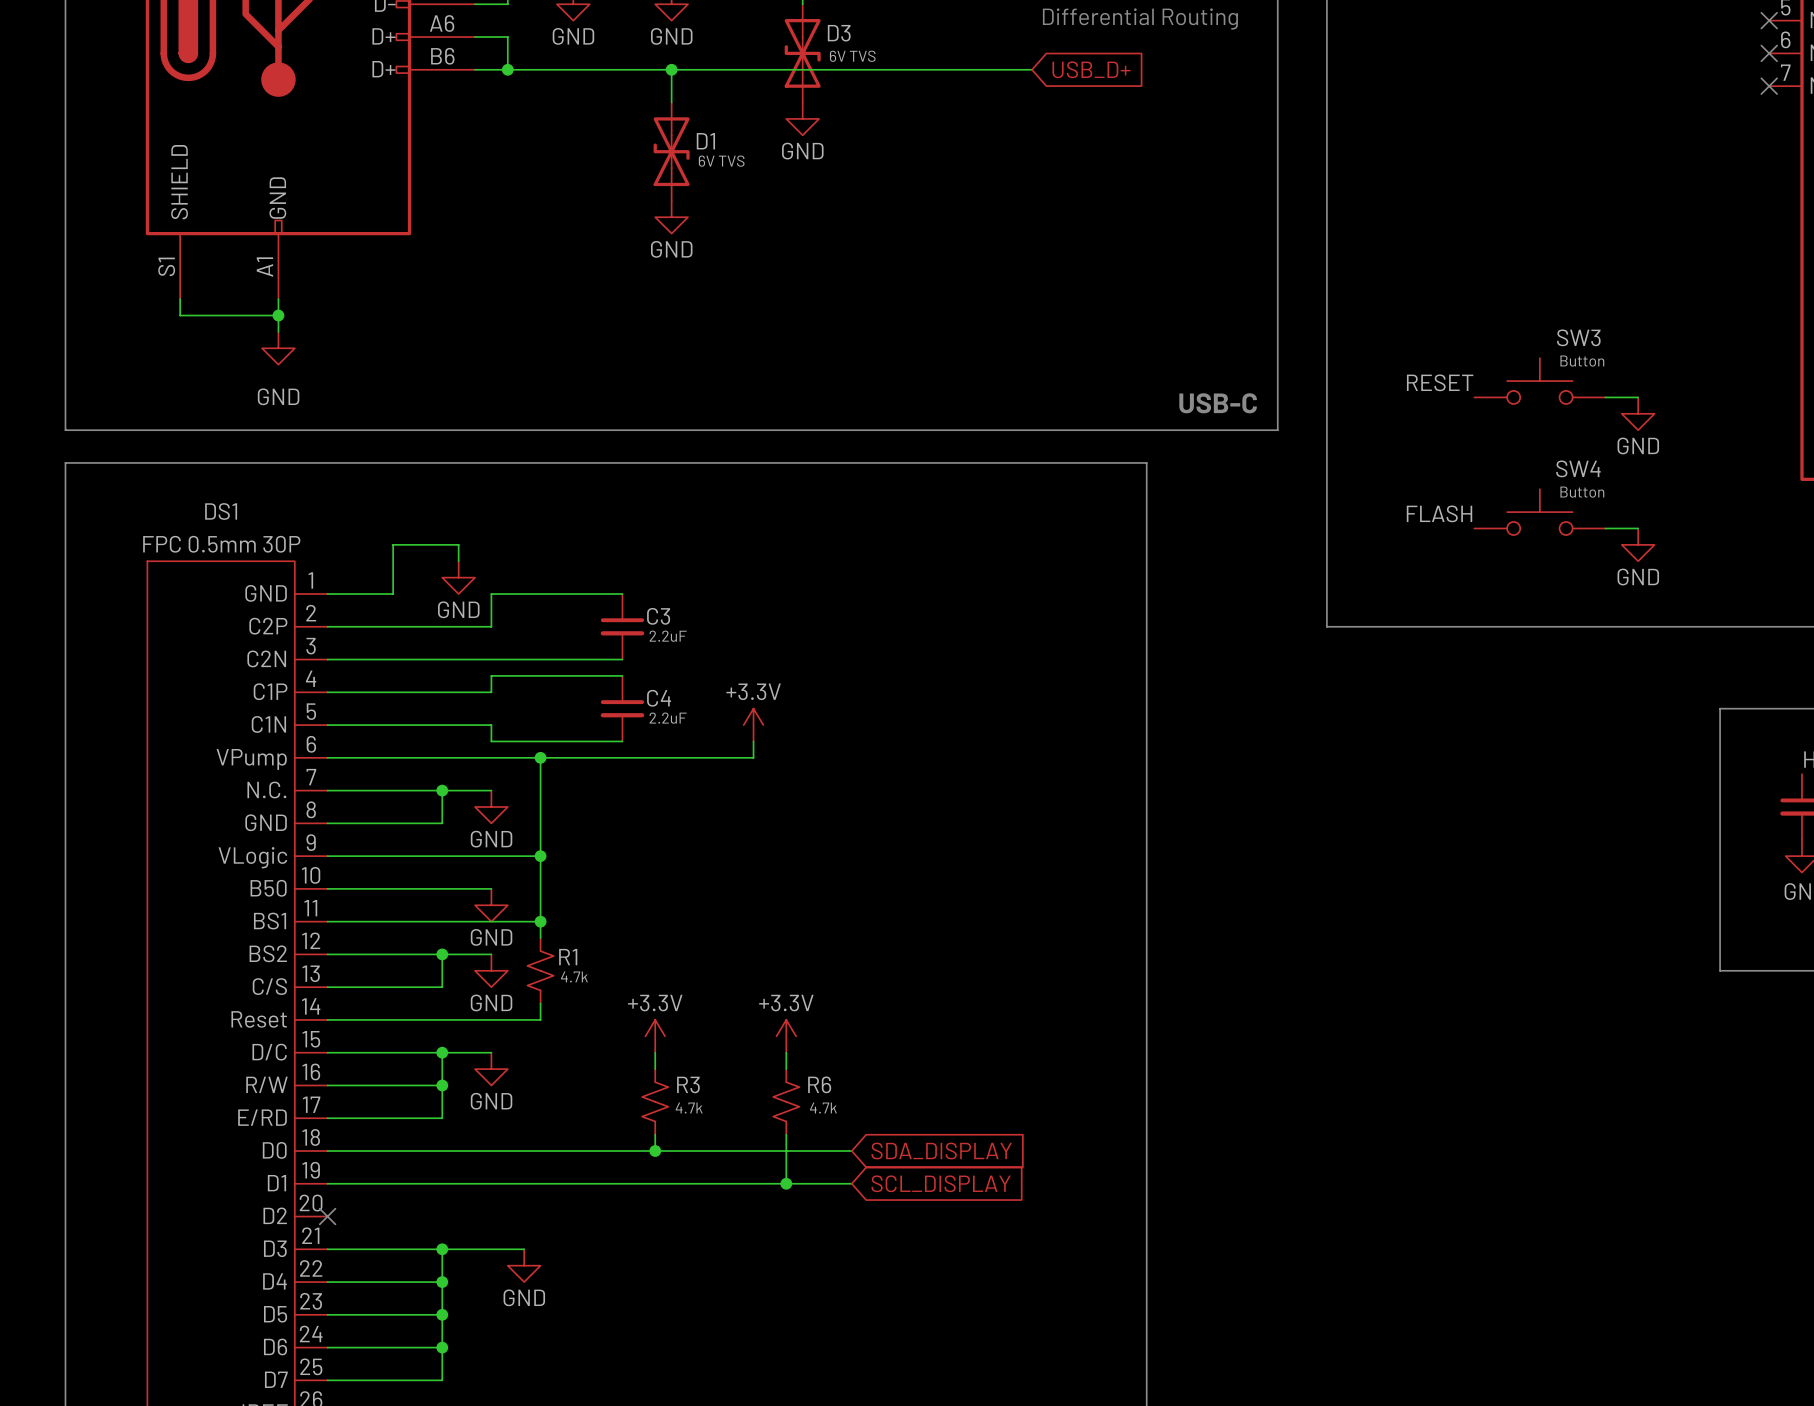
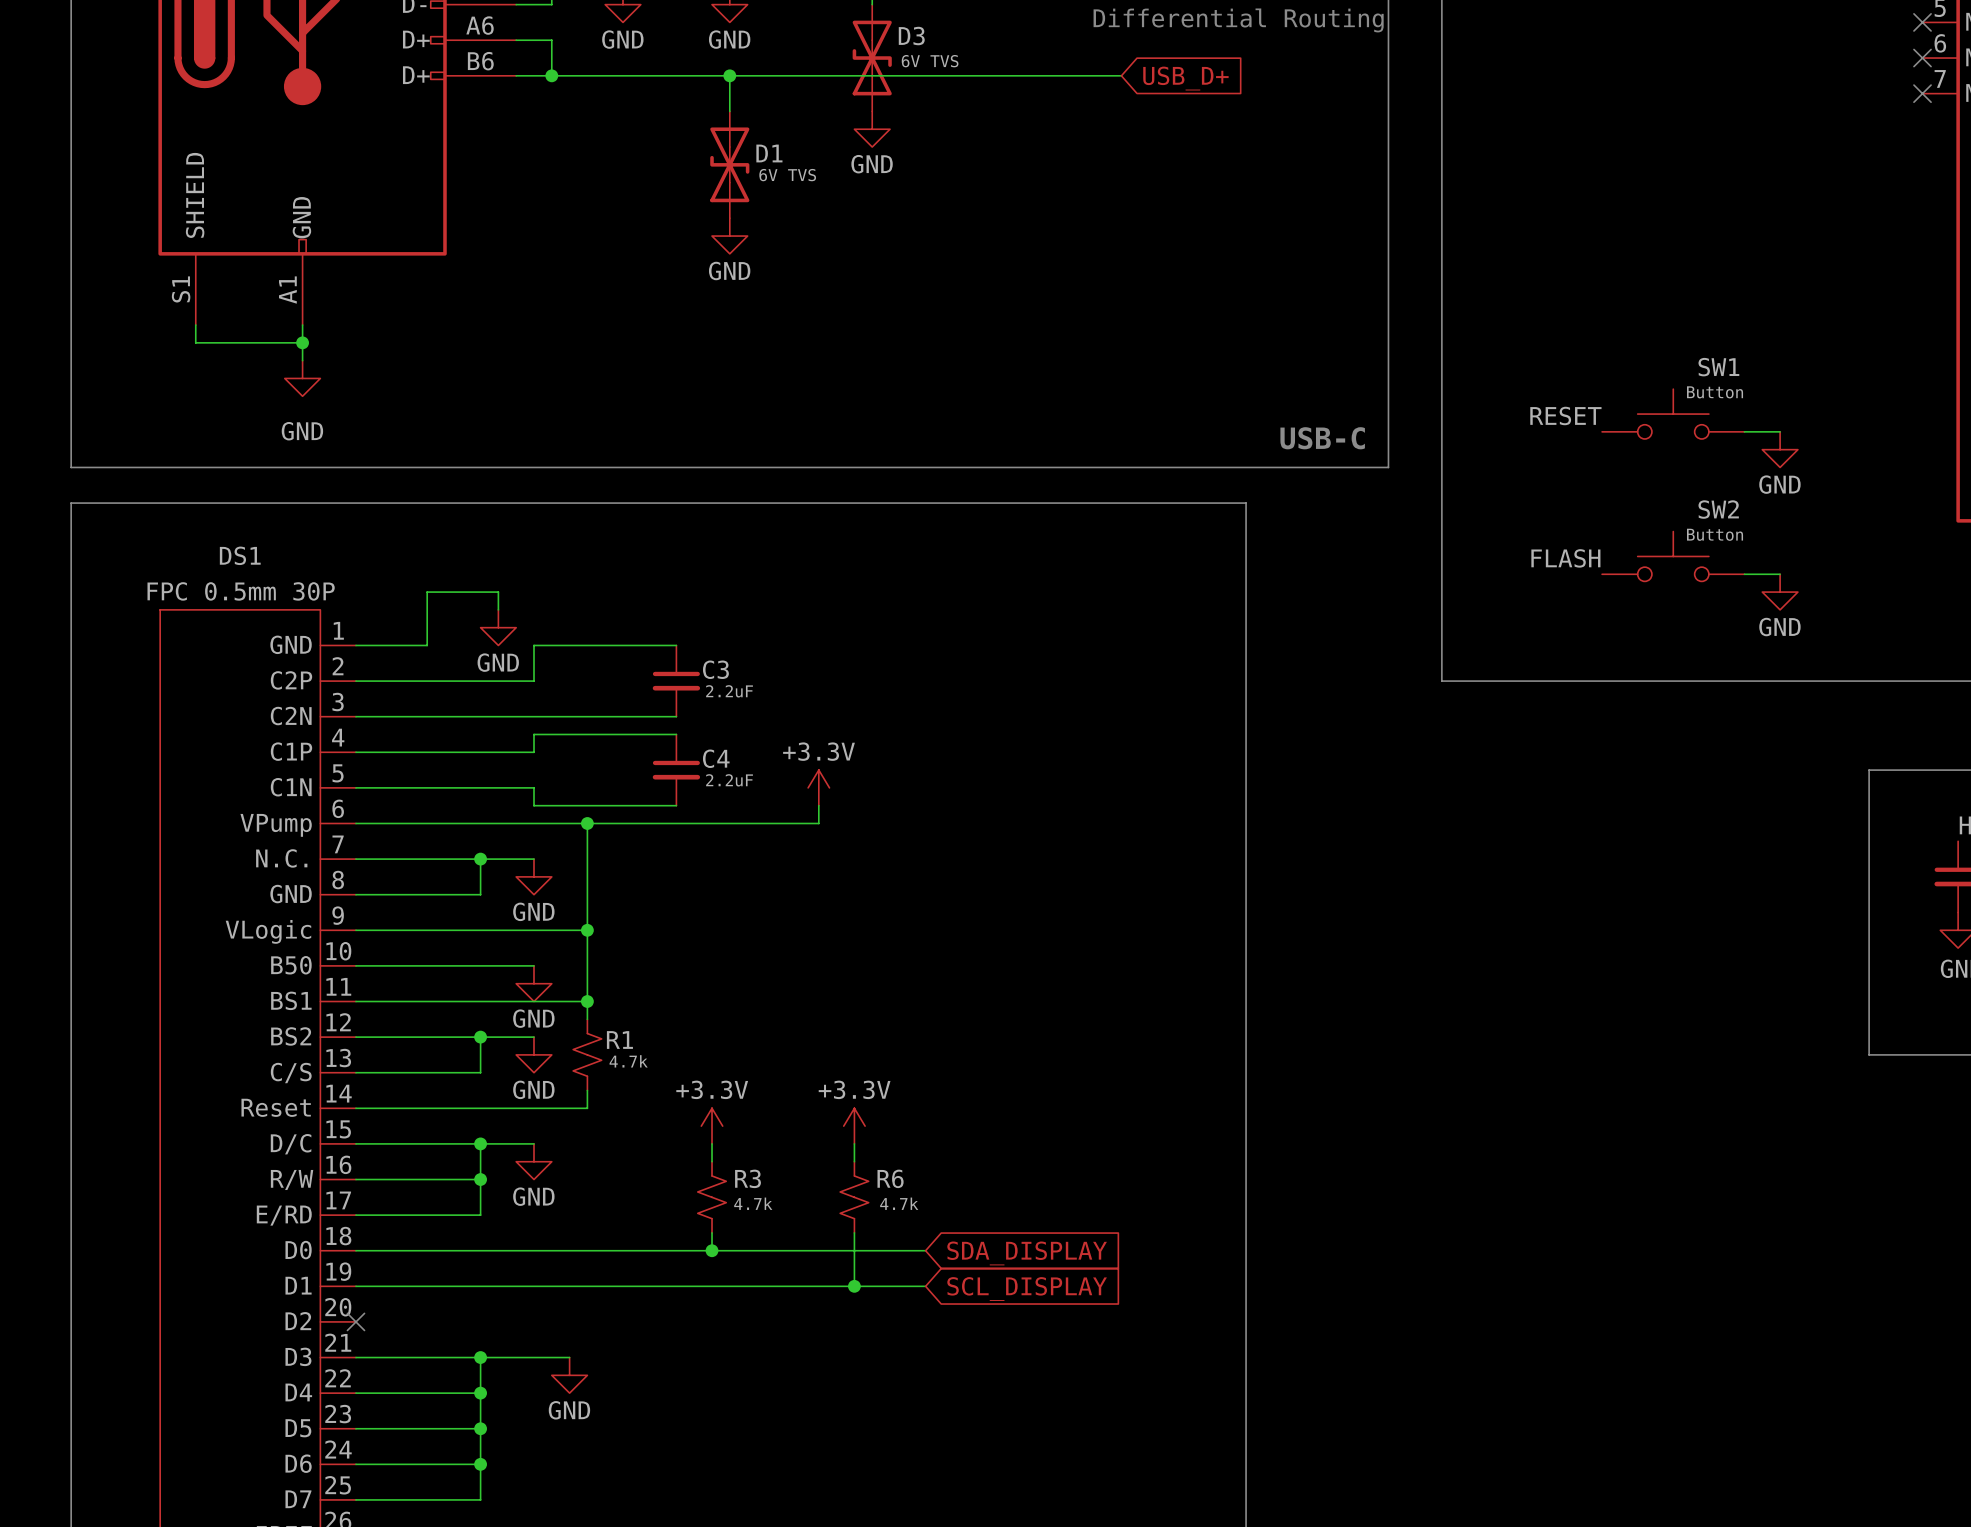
SW3 name: SW3 (1578, 337) -> SW1 (1718, 367)
SW4 name: SW4 (1578, 468) -> SW2 (1718, 509)

